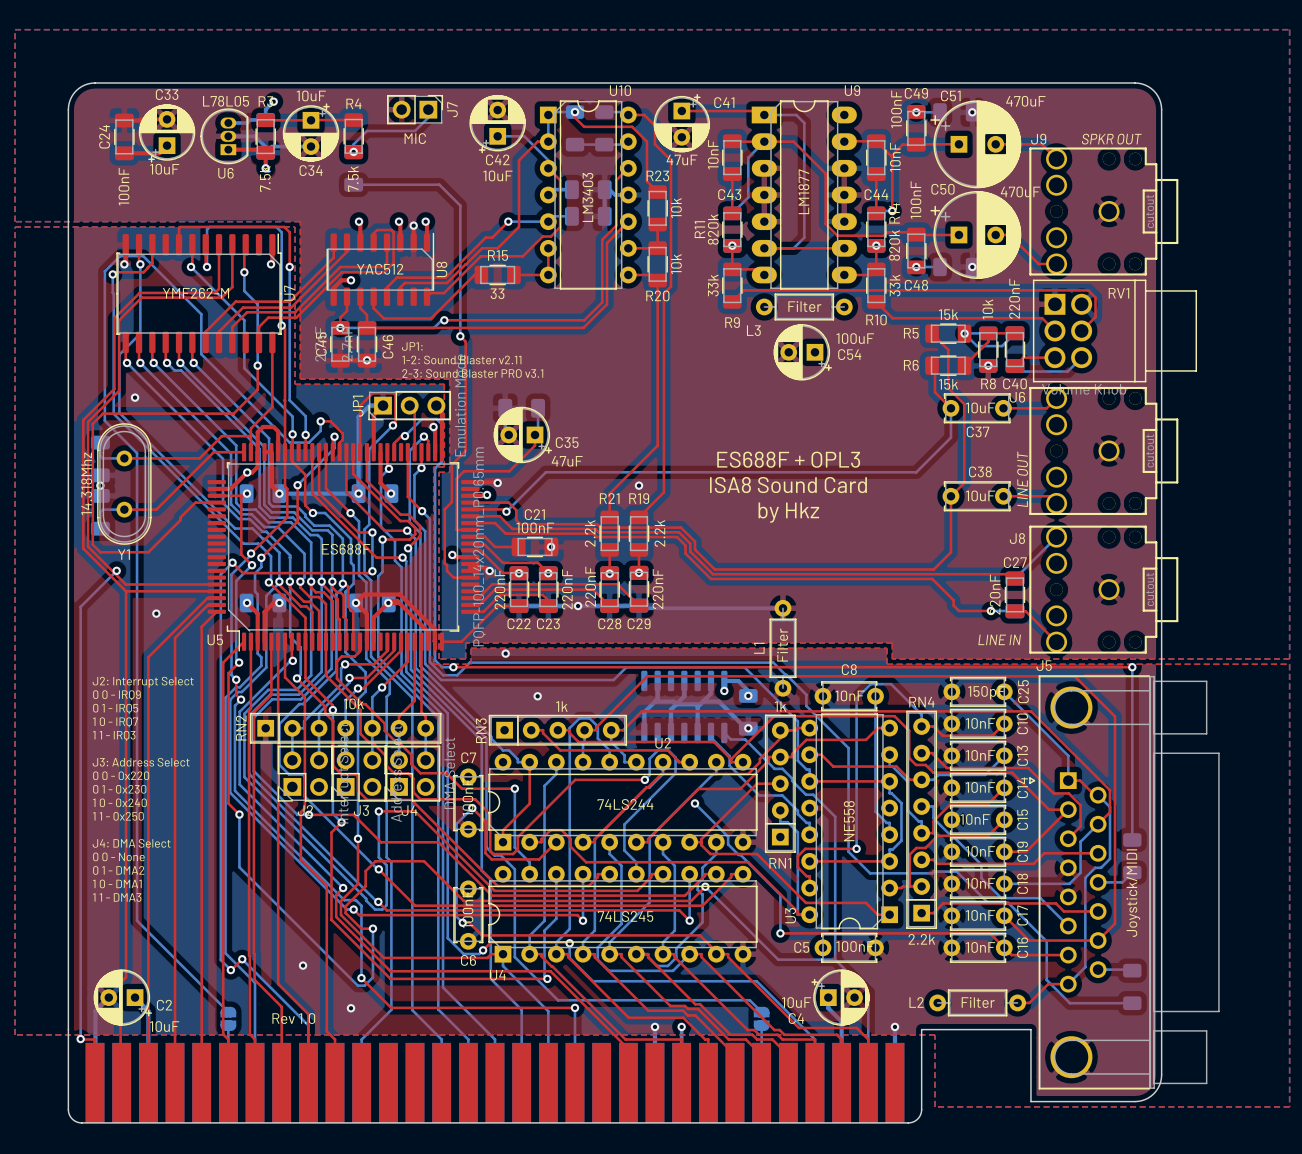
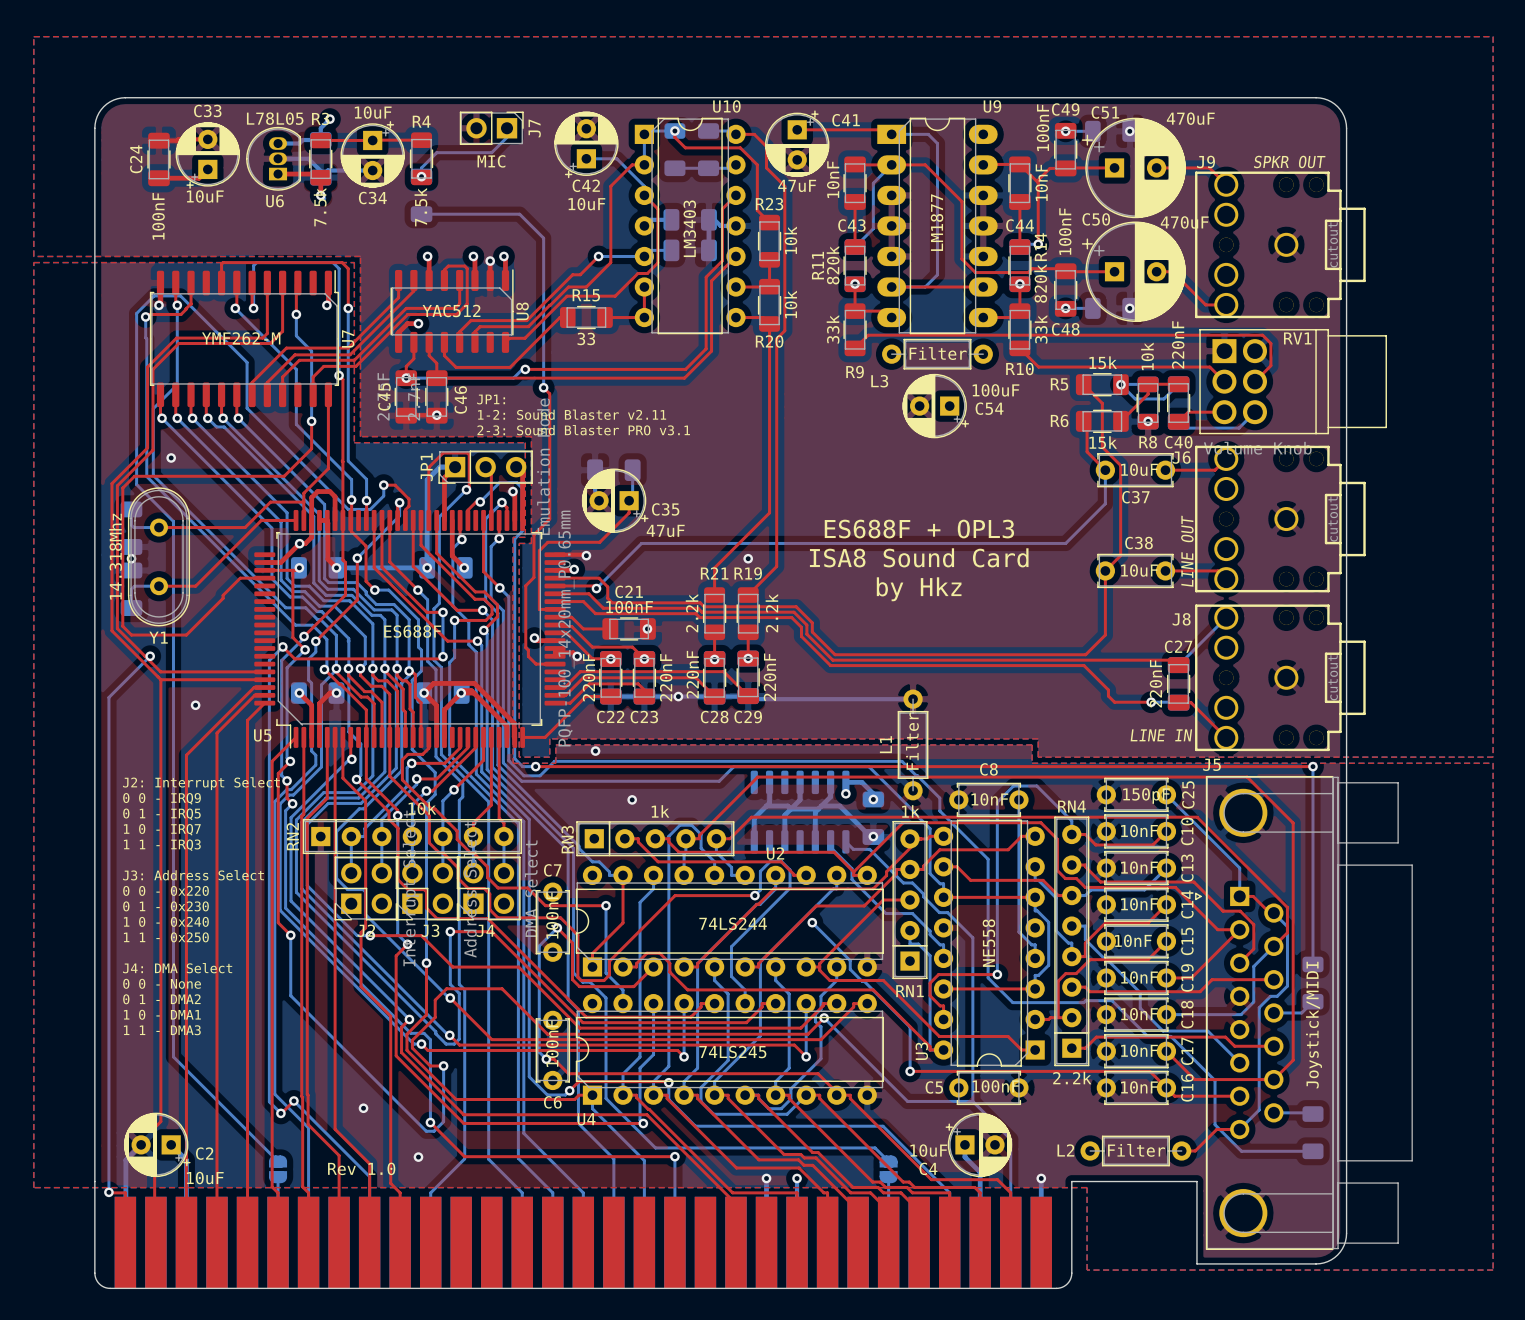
RV1 footprint: [1033, 279, 1197, 383] -> [1199, 329, 1387, 435]

